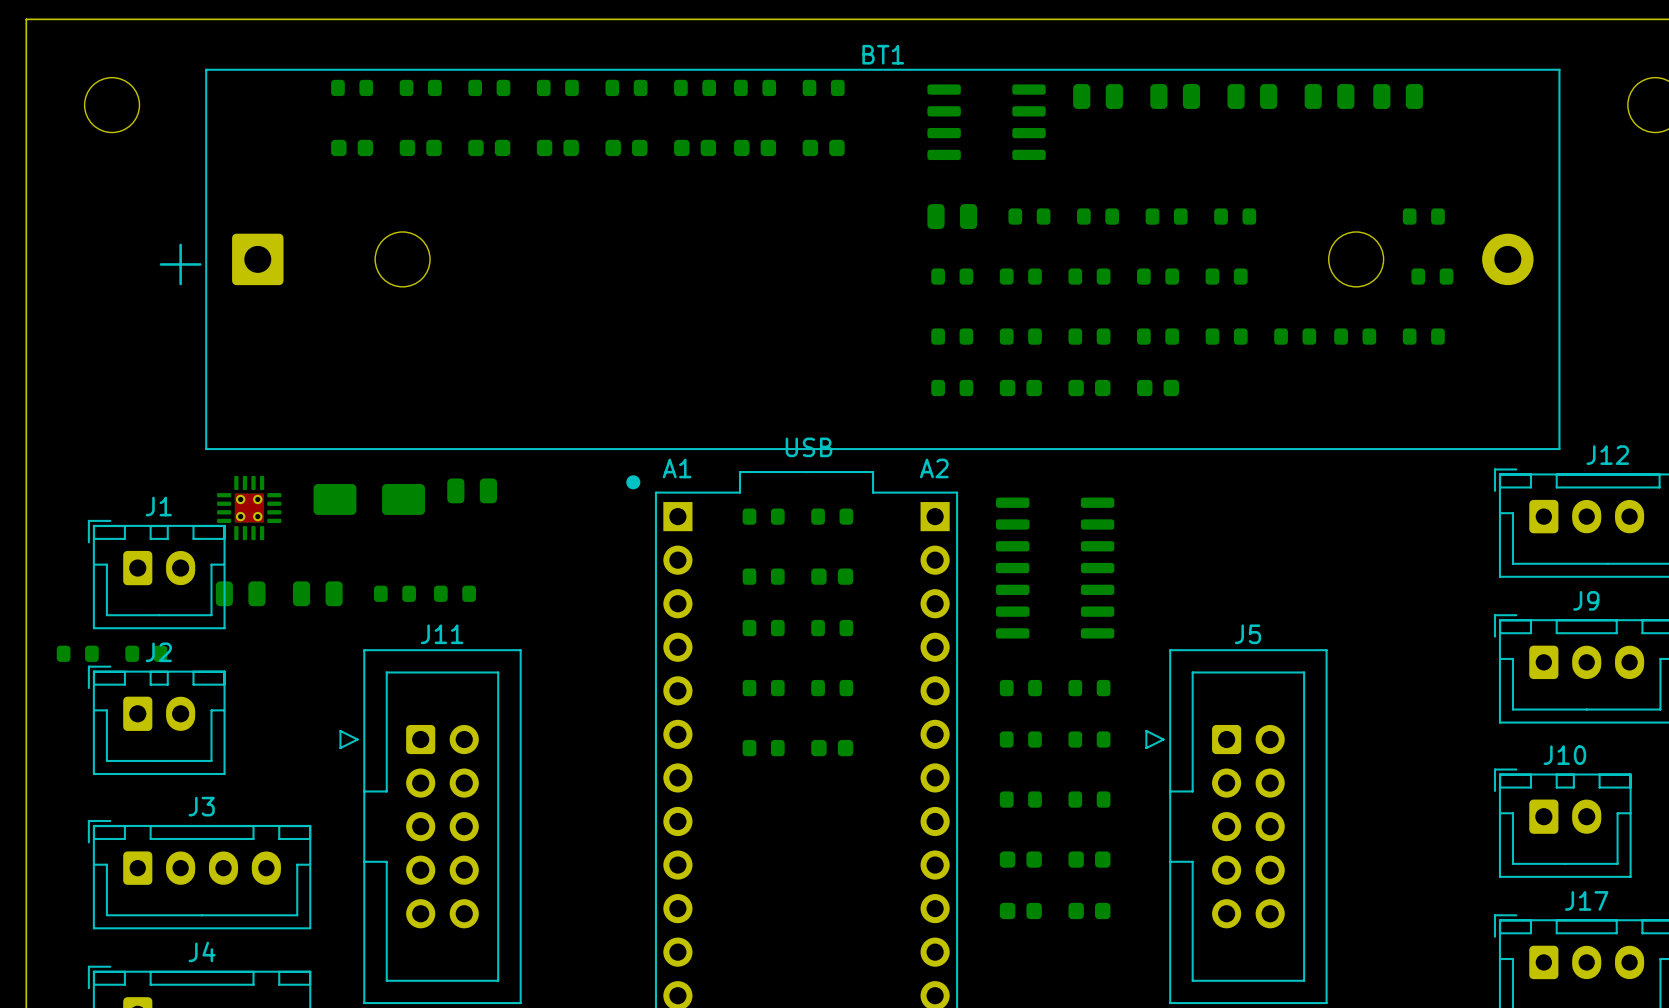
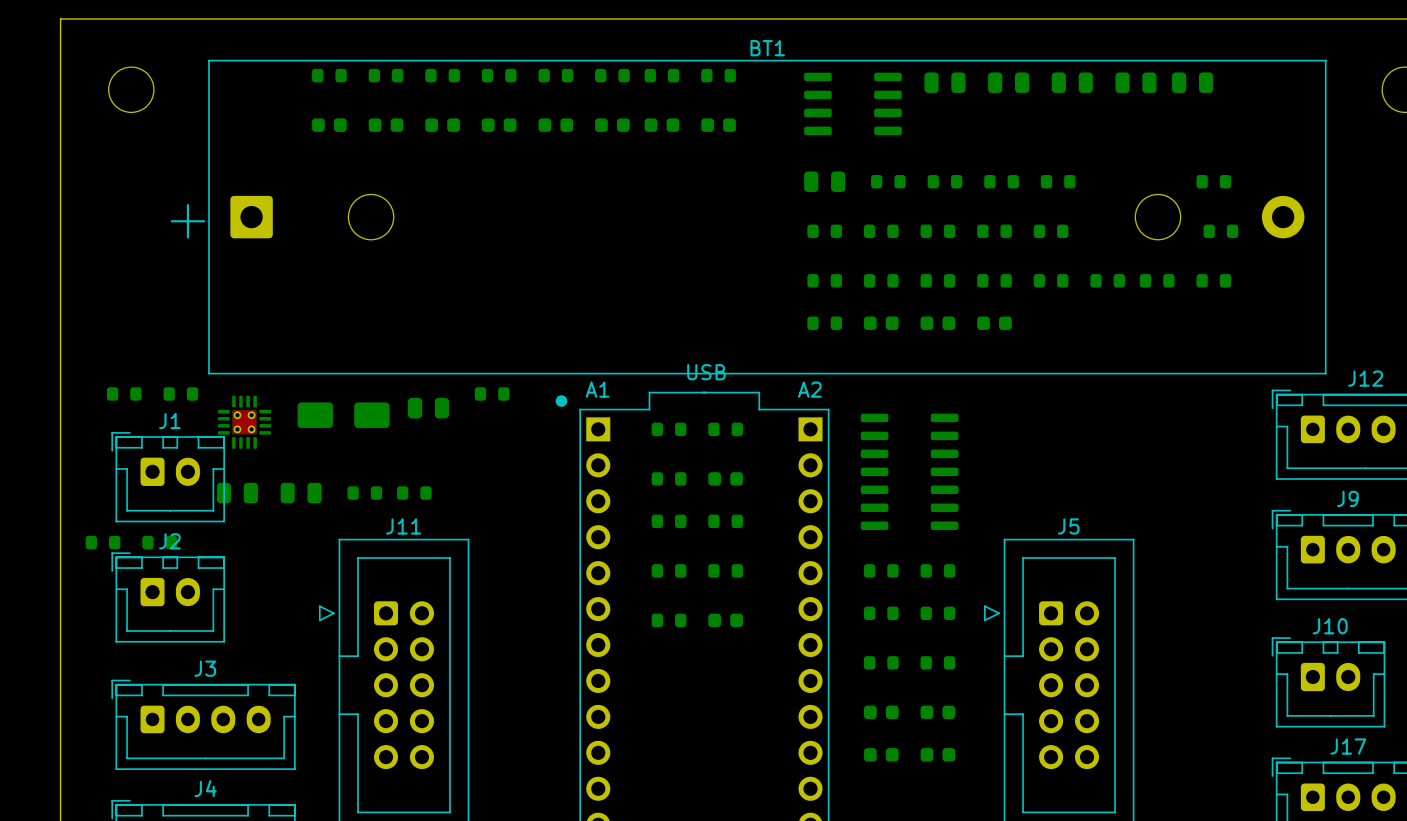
part: none -> (124, 393)
part: none -> (180, 393)
part: none -> (492, 393)

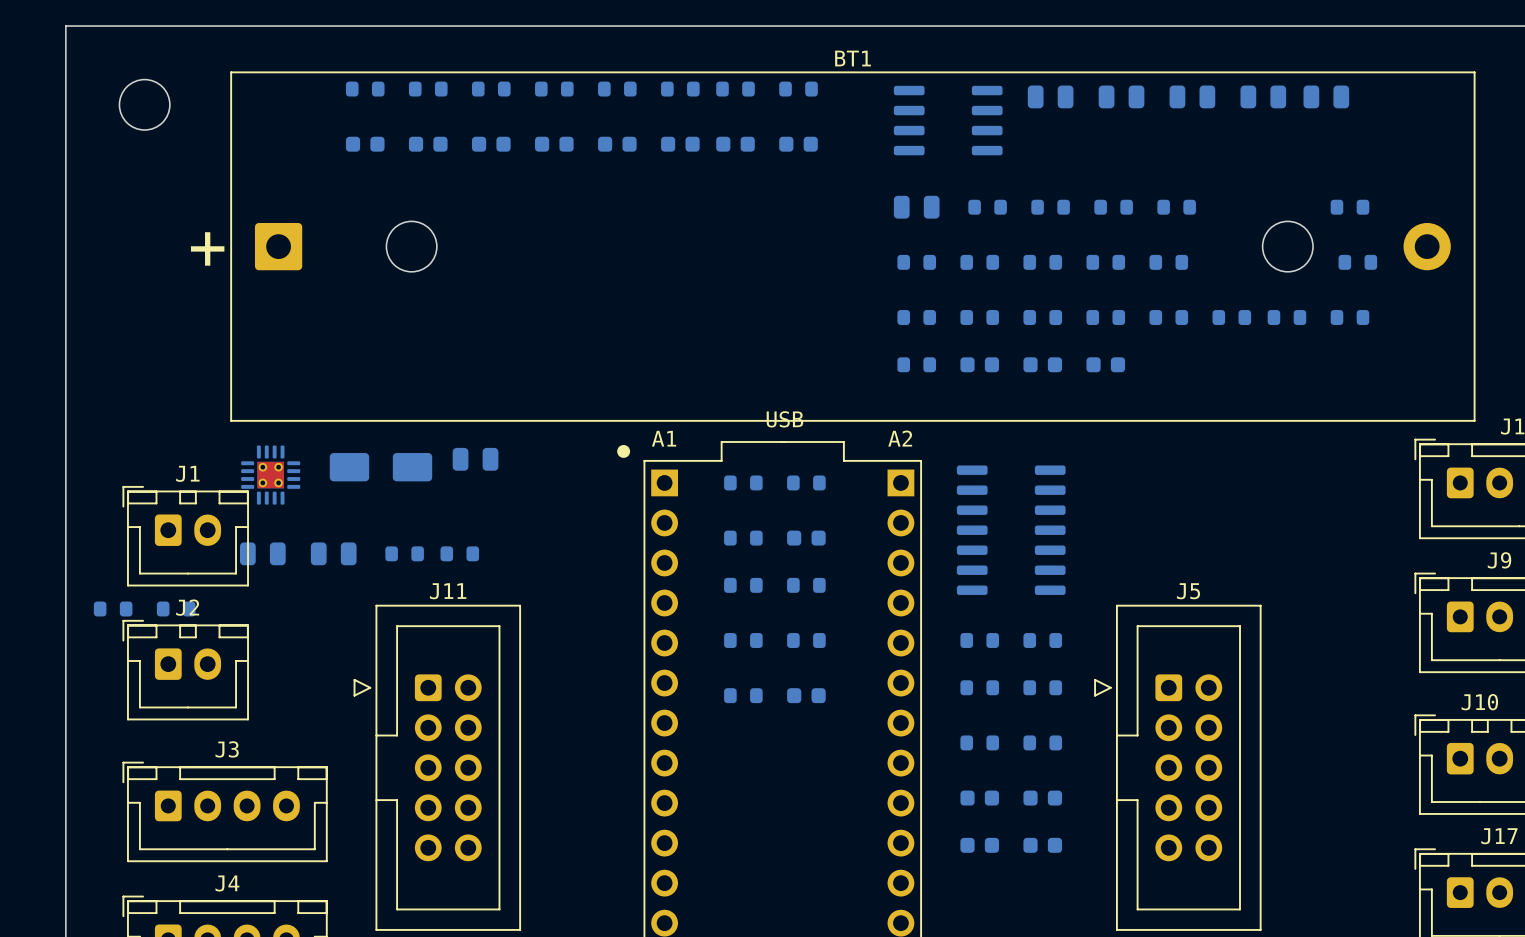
part: (124, 393) -> none
part: (180, 393) -> none
part: (492, 393) -> none

